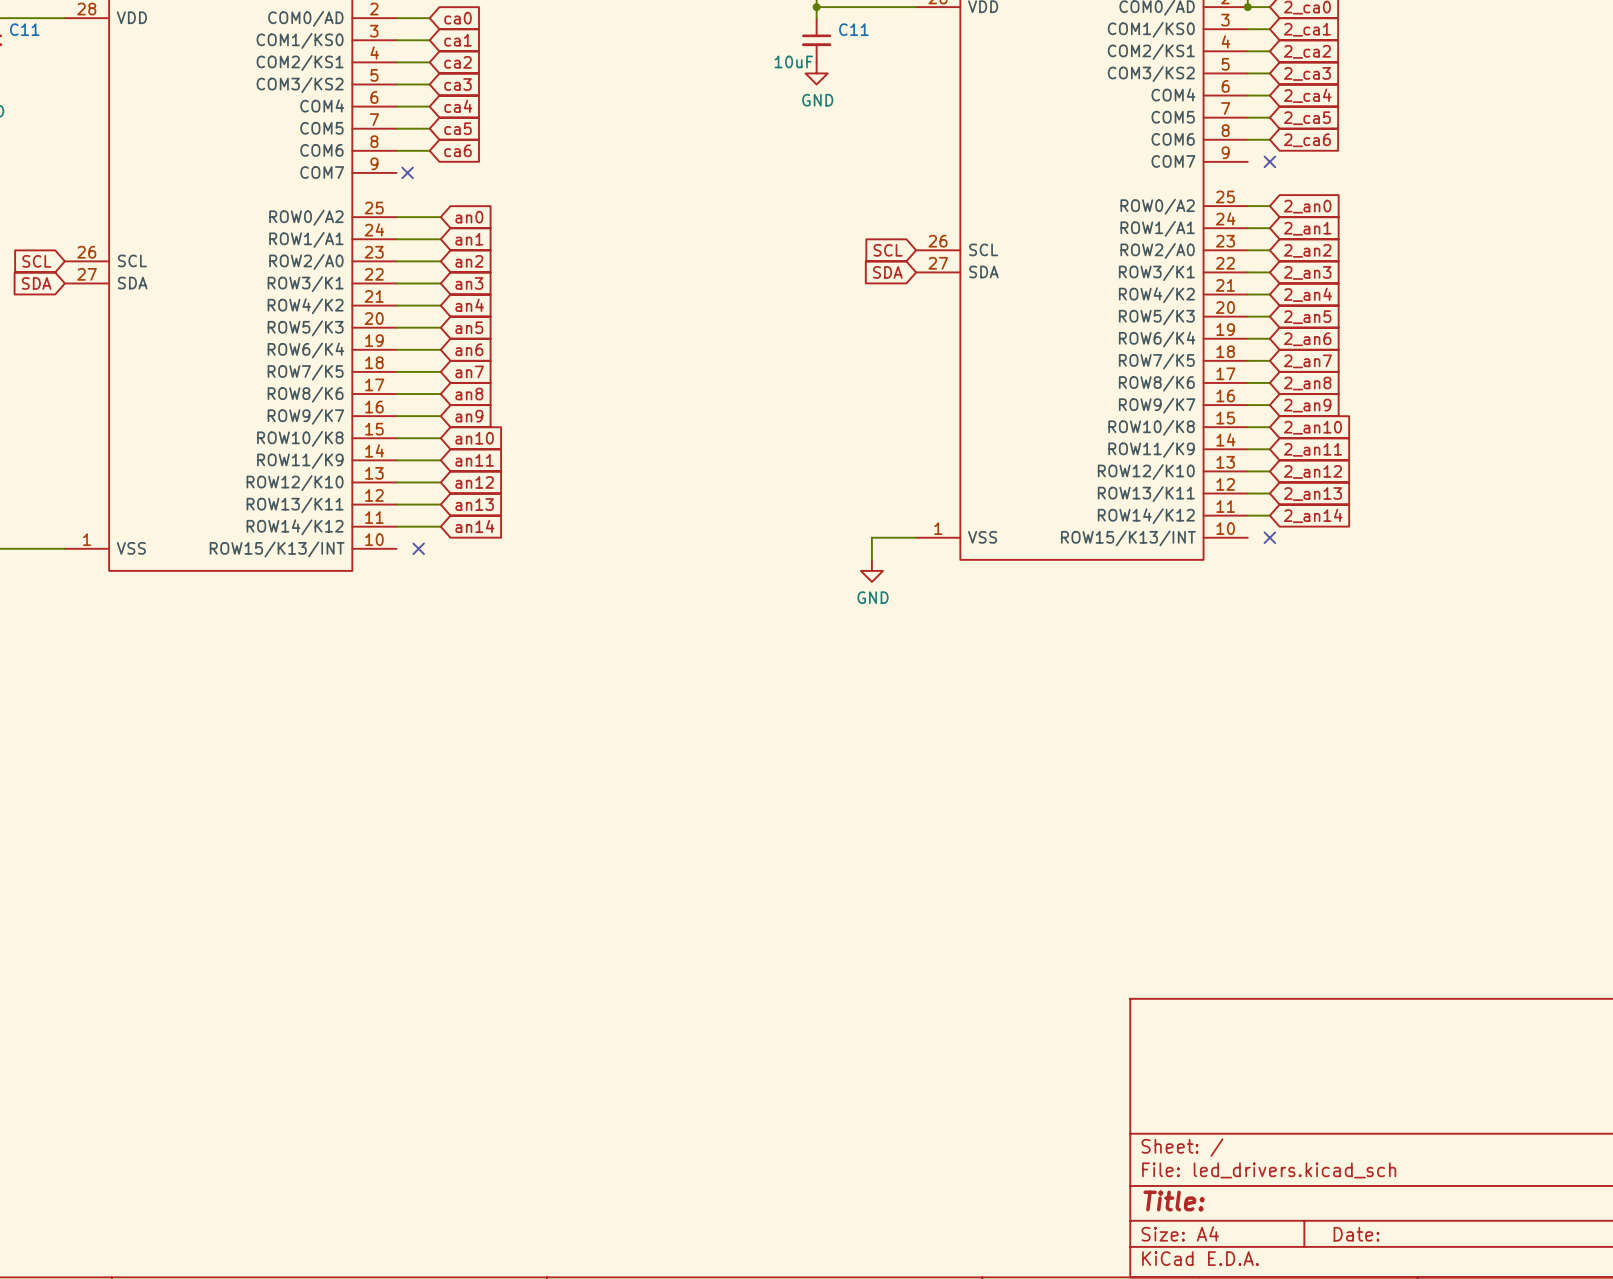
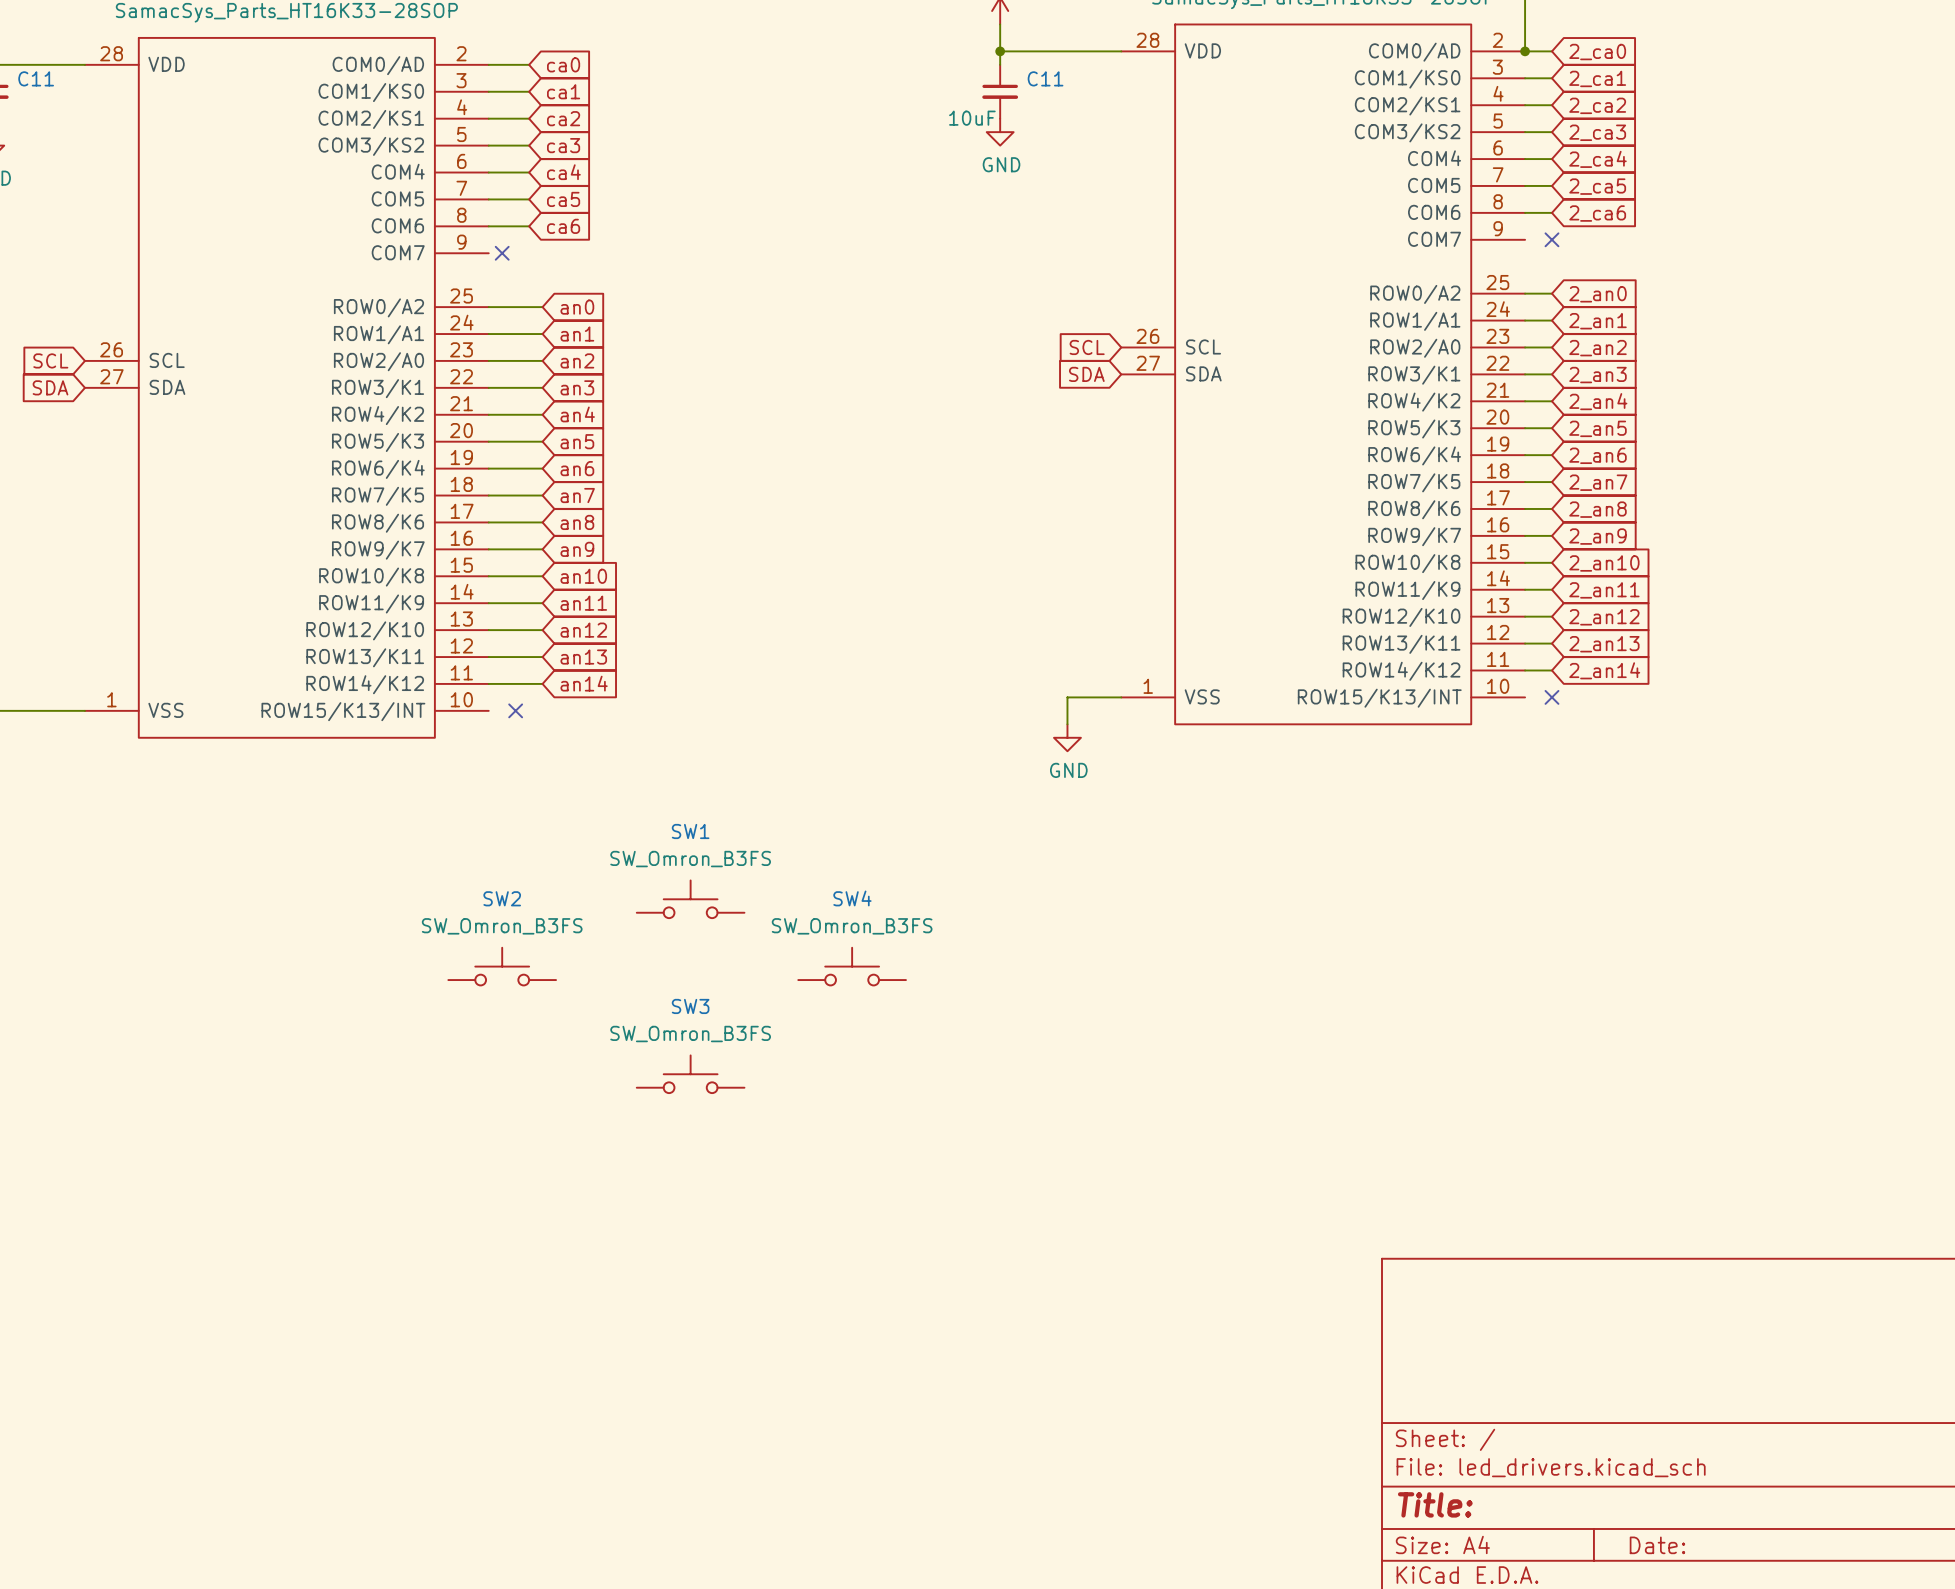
SW1: none -> SW_Omron_B3FS (690, 899)
SW2: none -> SW_Omron_B3FS (502, 966)
SW4: none -> SW_Omron_B3FS (852, 966)
SW3: none -> SW_Omron_B3FS (690, 1074)

